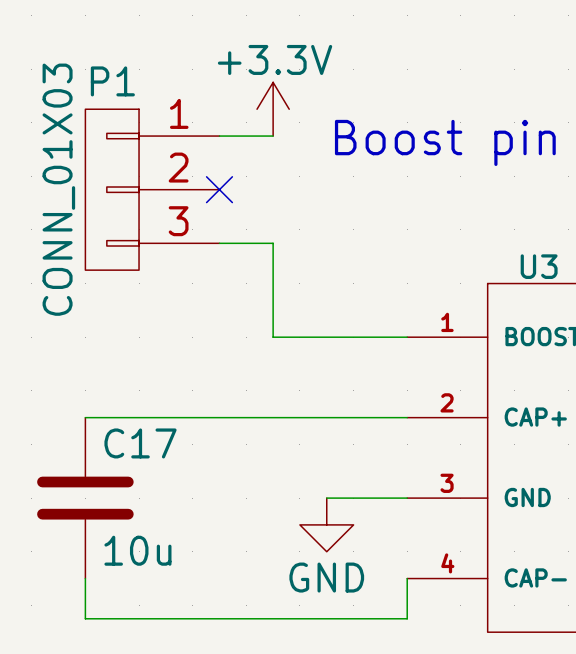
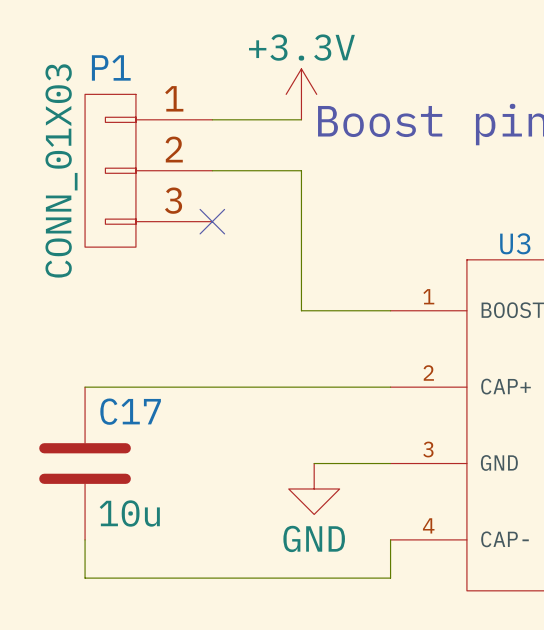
power symbol position: +3.3V (273, 109) -> +3.3V (301, 94)
wire: none -> (263, 119) (301, 119)
no-connect mark position: (219, 189) -> (212, 221)
wire: (219, 243) (273, 243) (273, 337) (313, 337) -> (212, 170) (301, 170) (301, 310)

